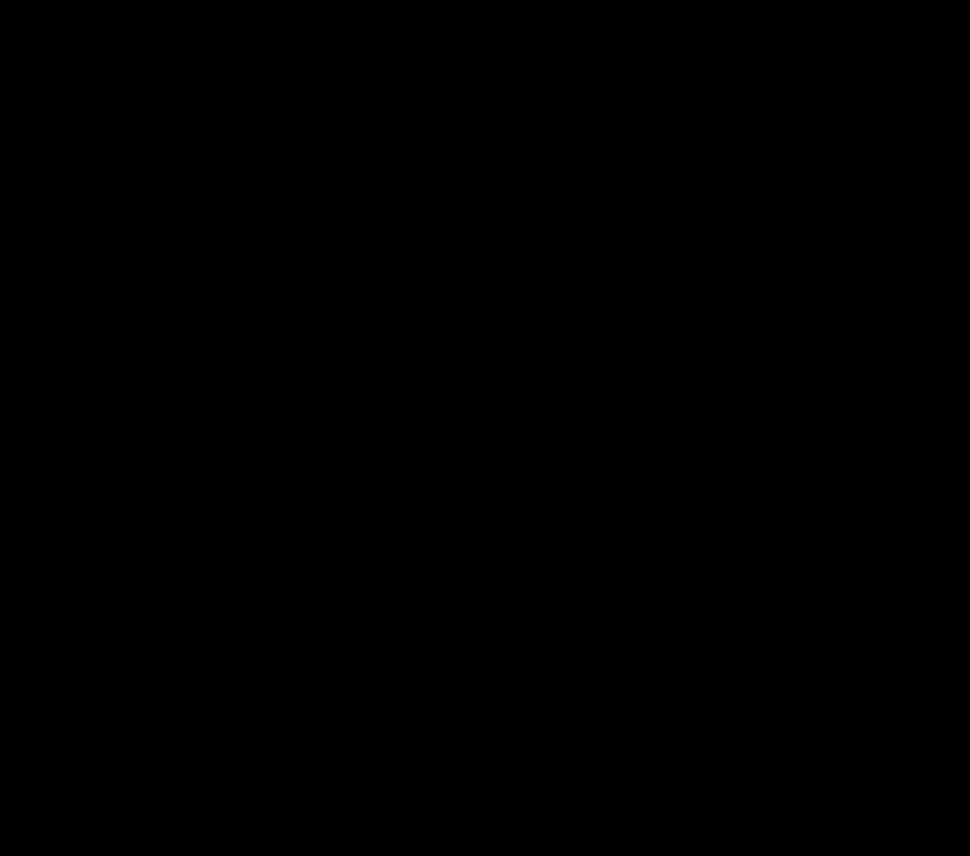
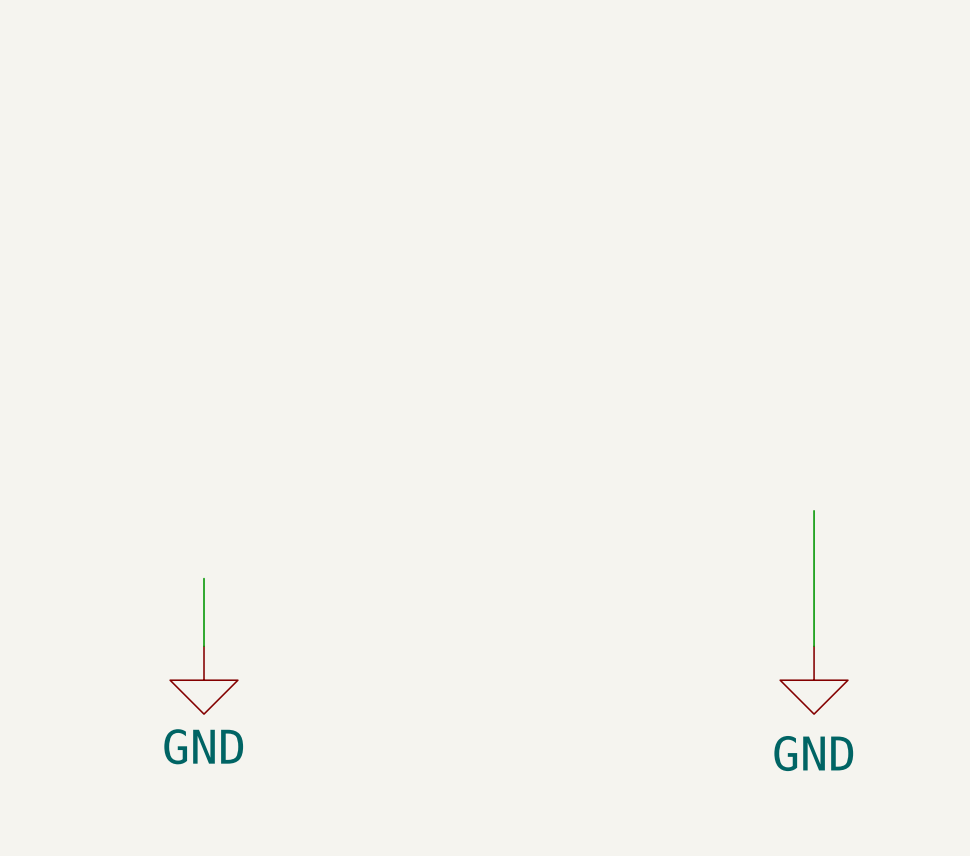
wire: none -> (814, 510) (814, 646)
wire: none -> (204, 578) (204, 646)
power symbol: none -> GND (204, 680)
power symbol: none -> GND (814, 680)

